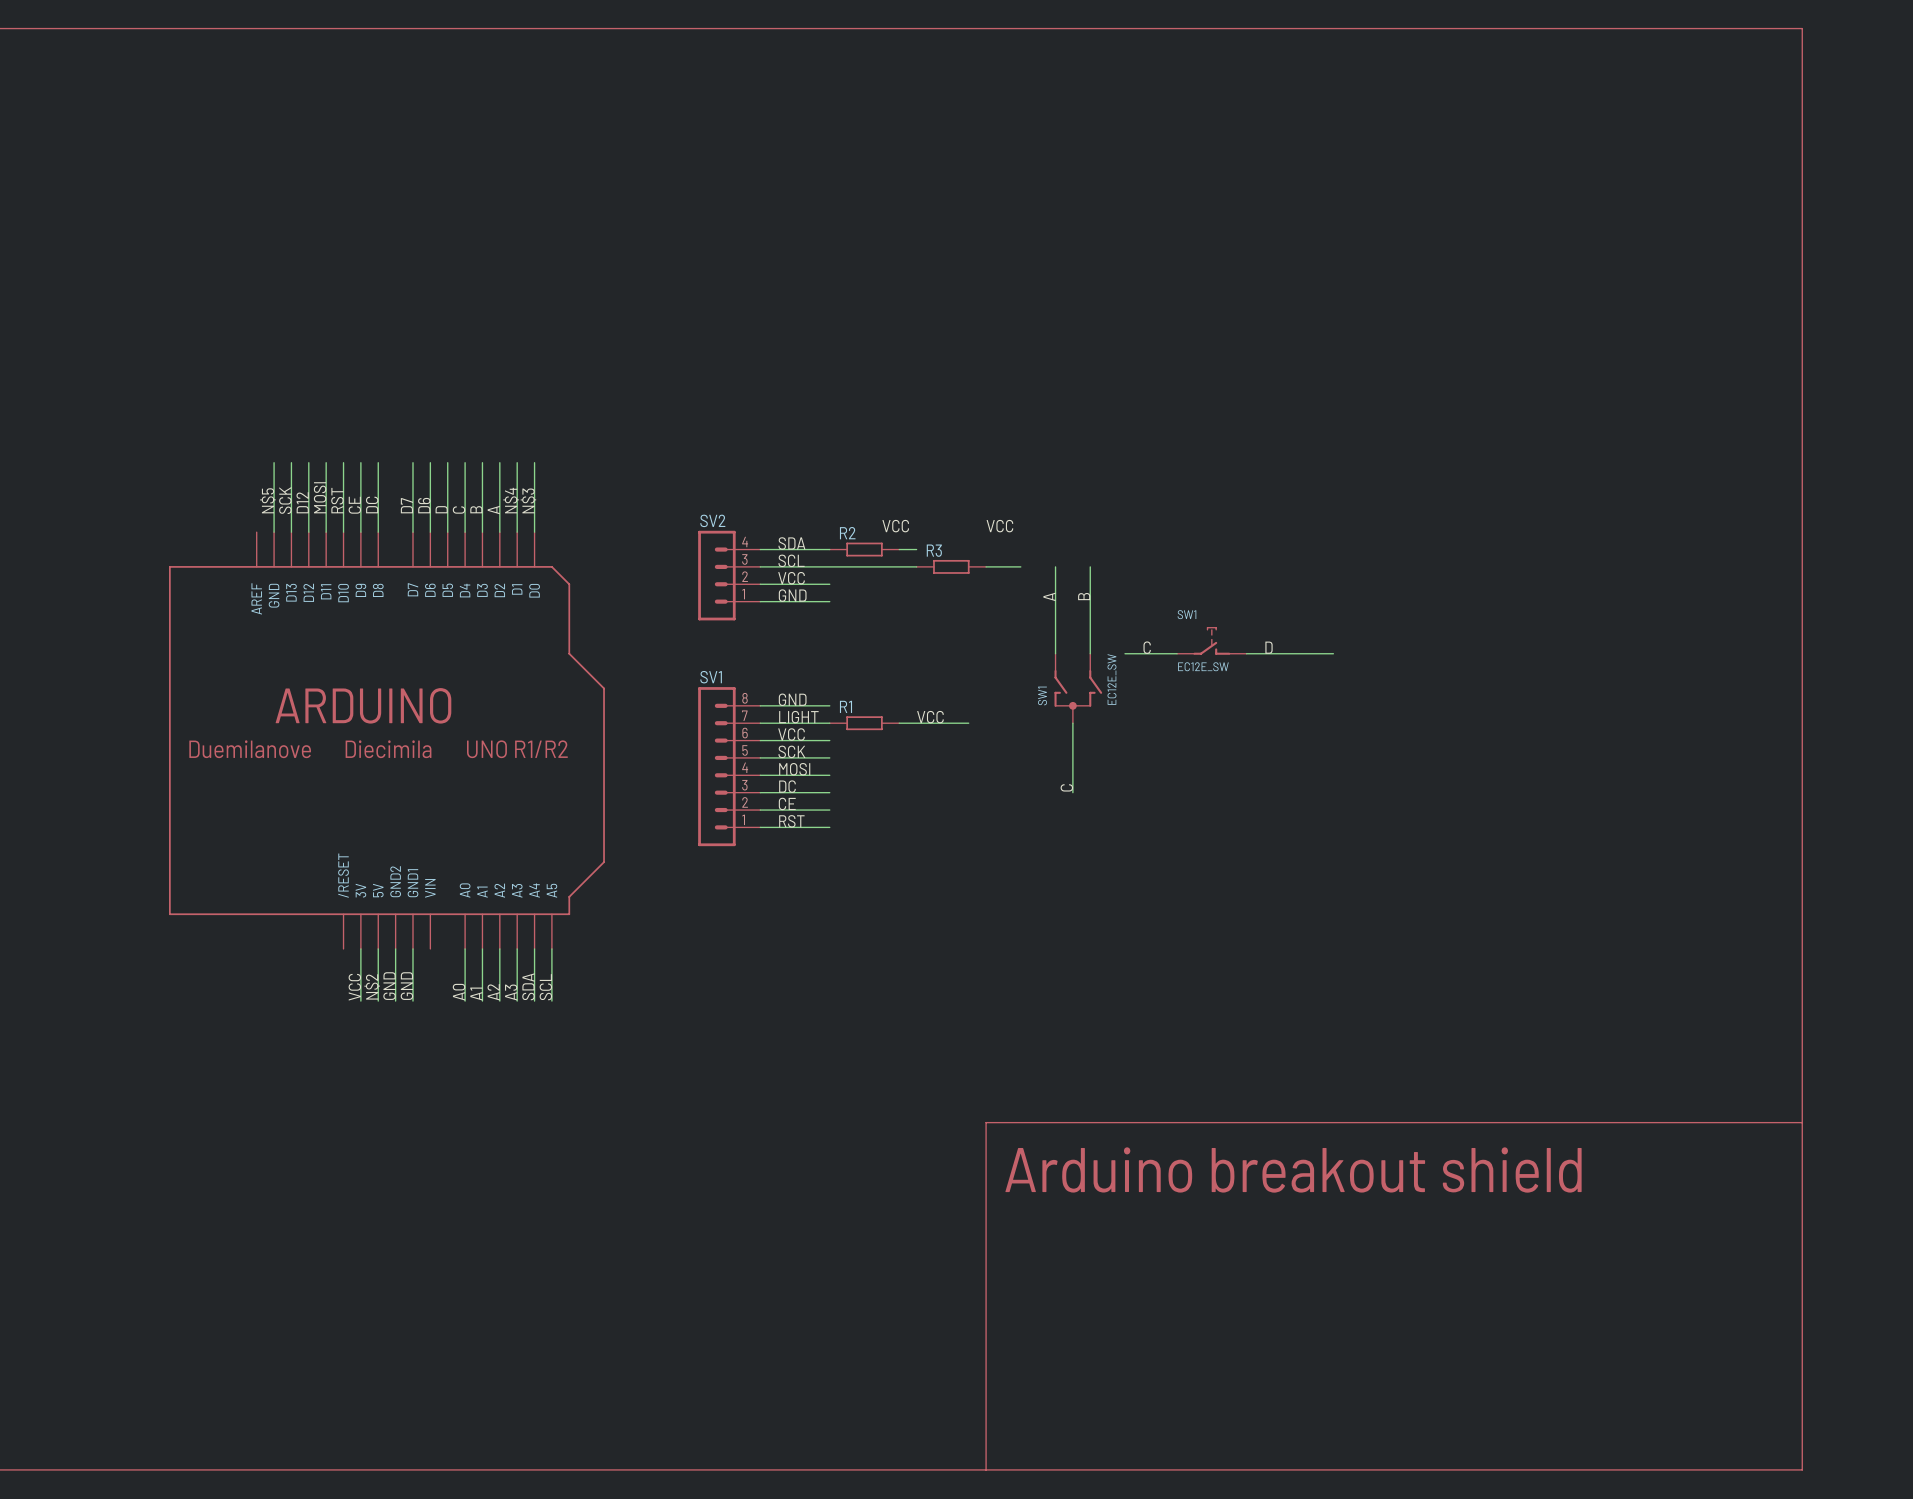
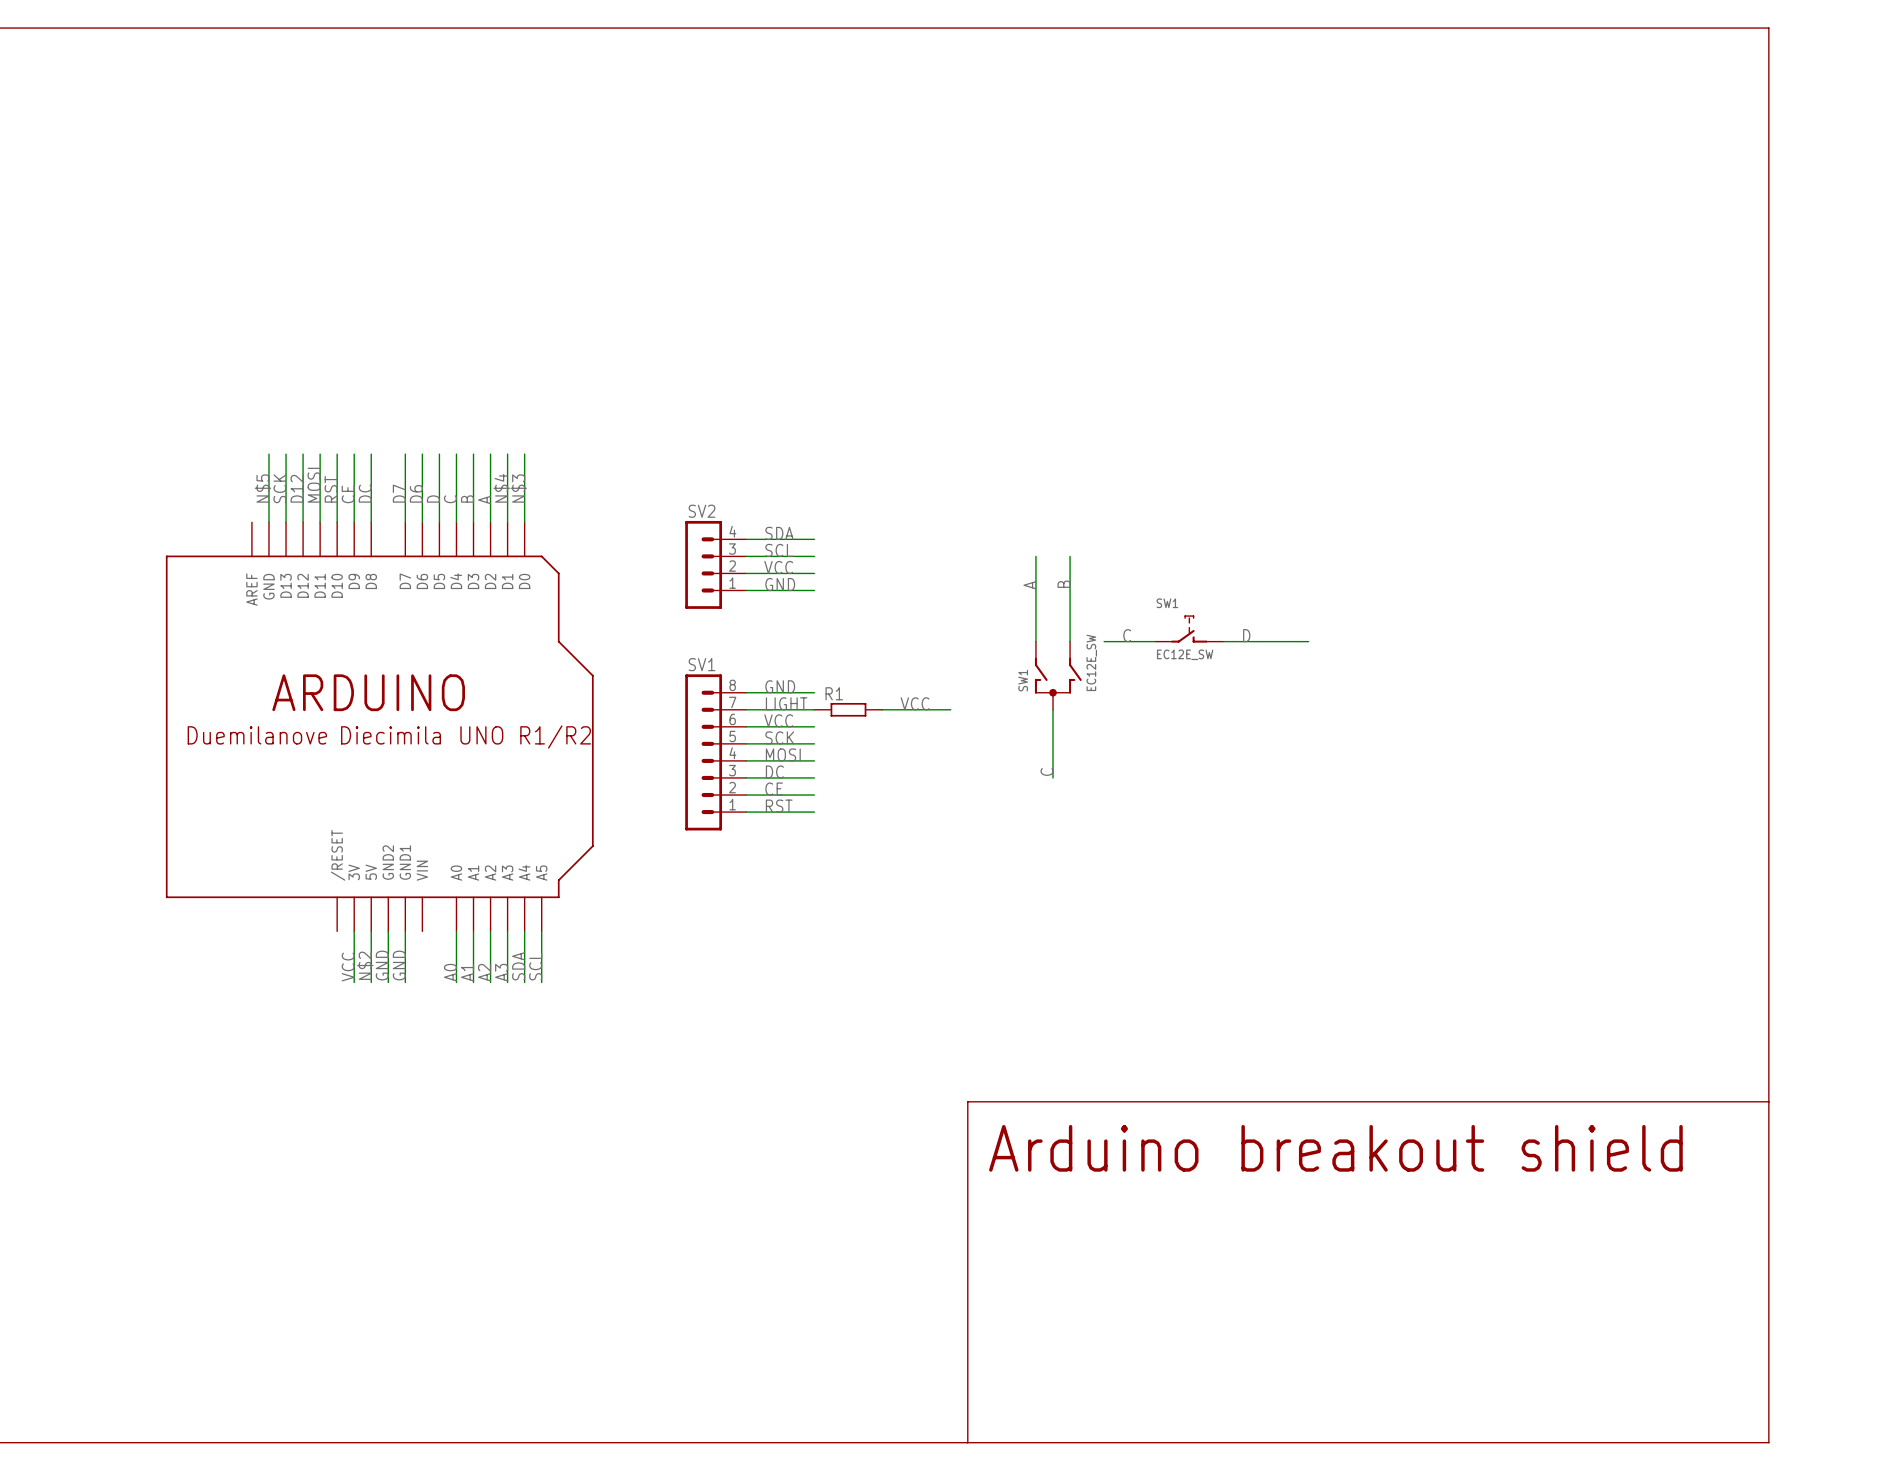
label: VCC (895, 526) -> none
label: VCC (999, 526) -> none
R2: (864, 549) -> none
wire: (899, 549) (916, 549) -> none
wire: (829, 566) (916, 566) -> none
R3: (951, 566) -> none
wire: (986, 566) (1020, 566) -> none

